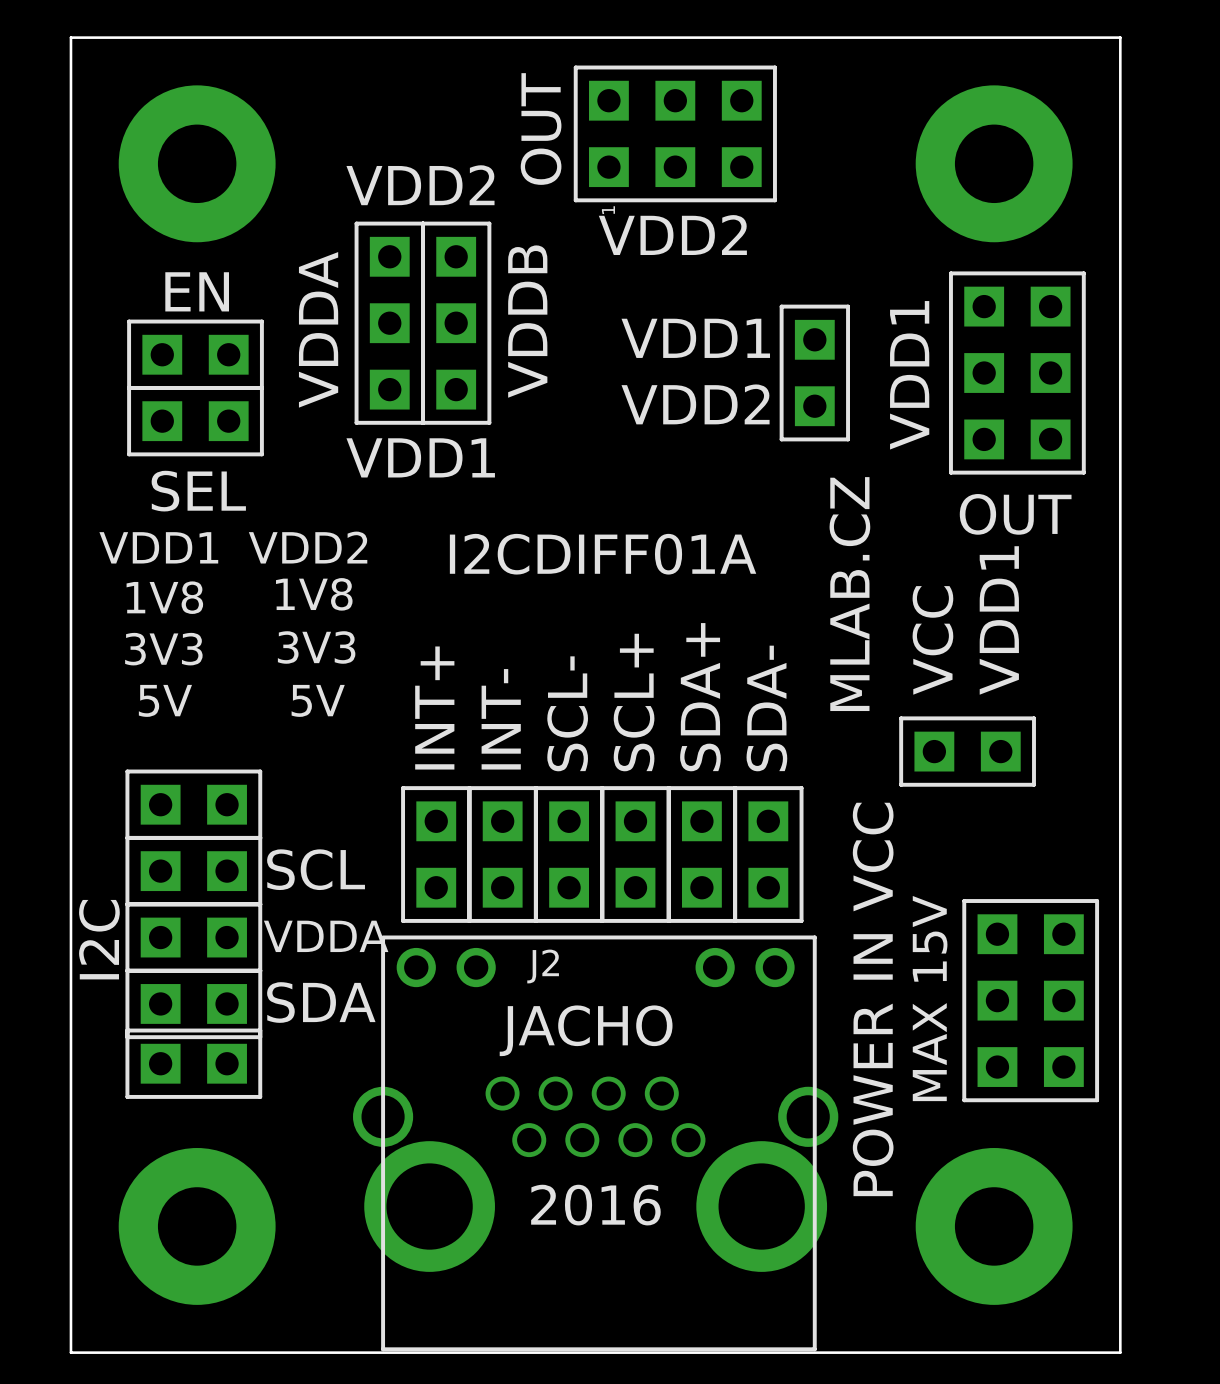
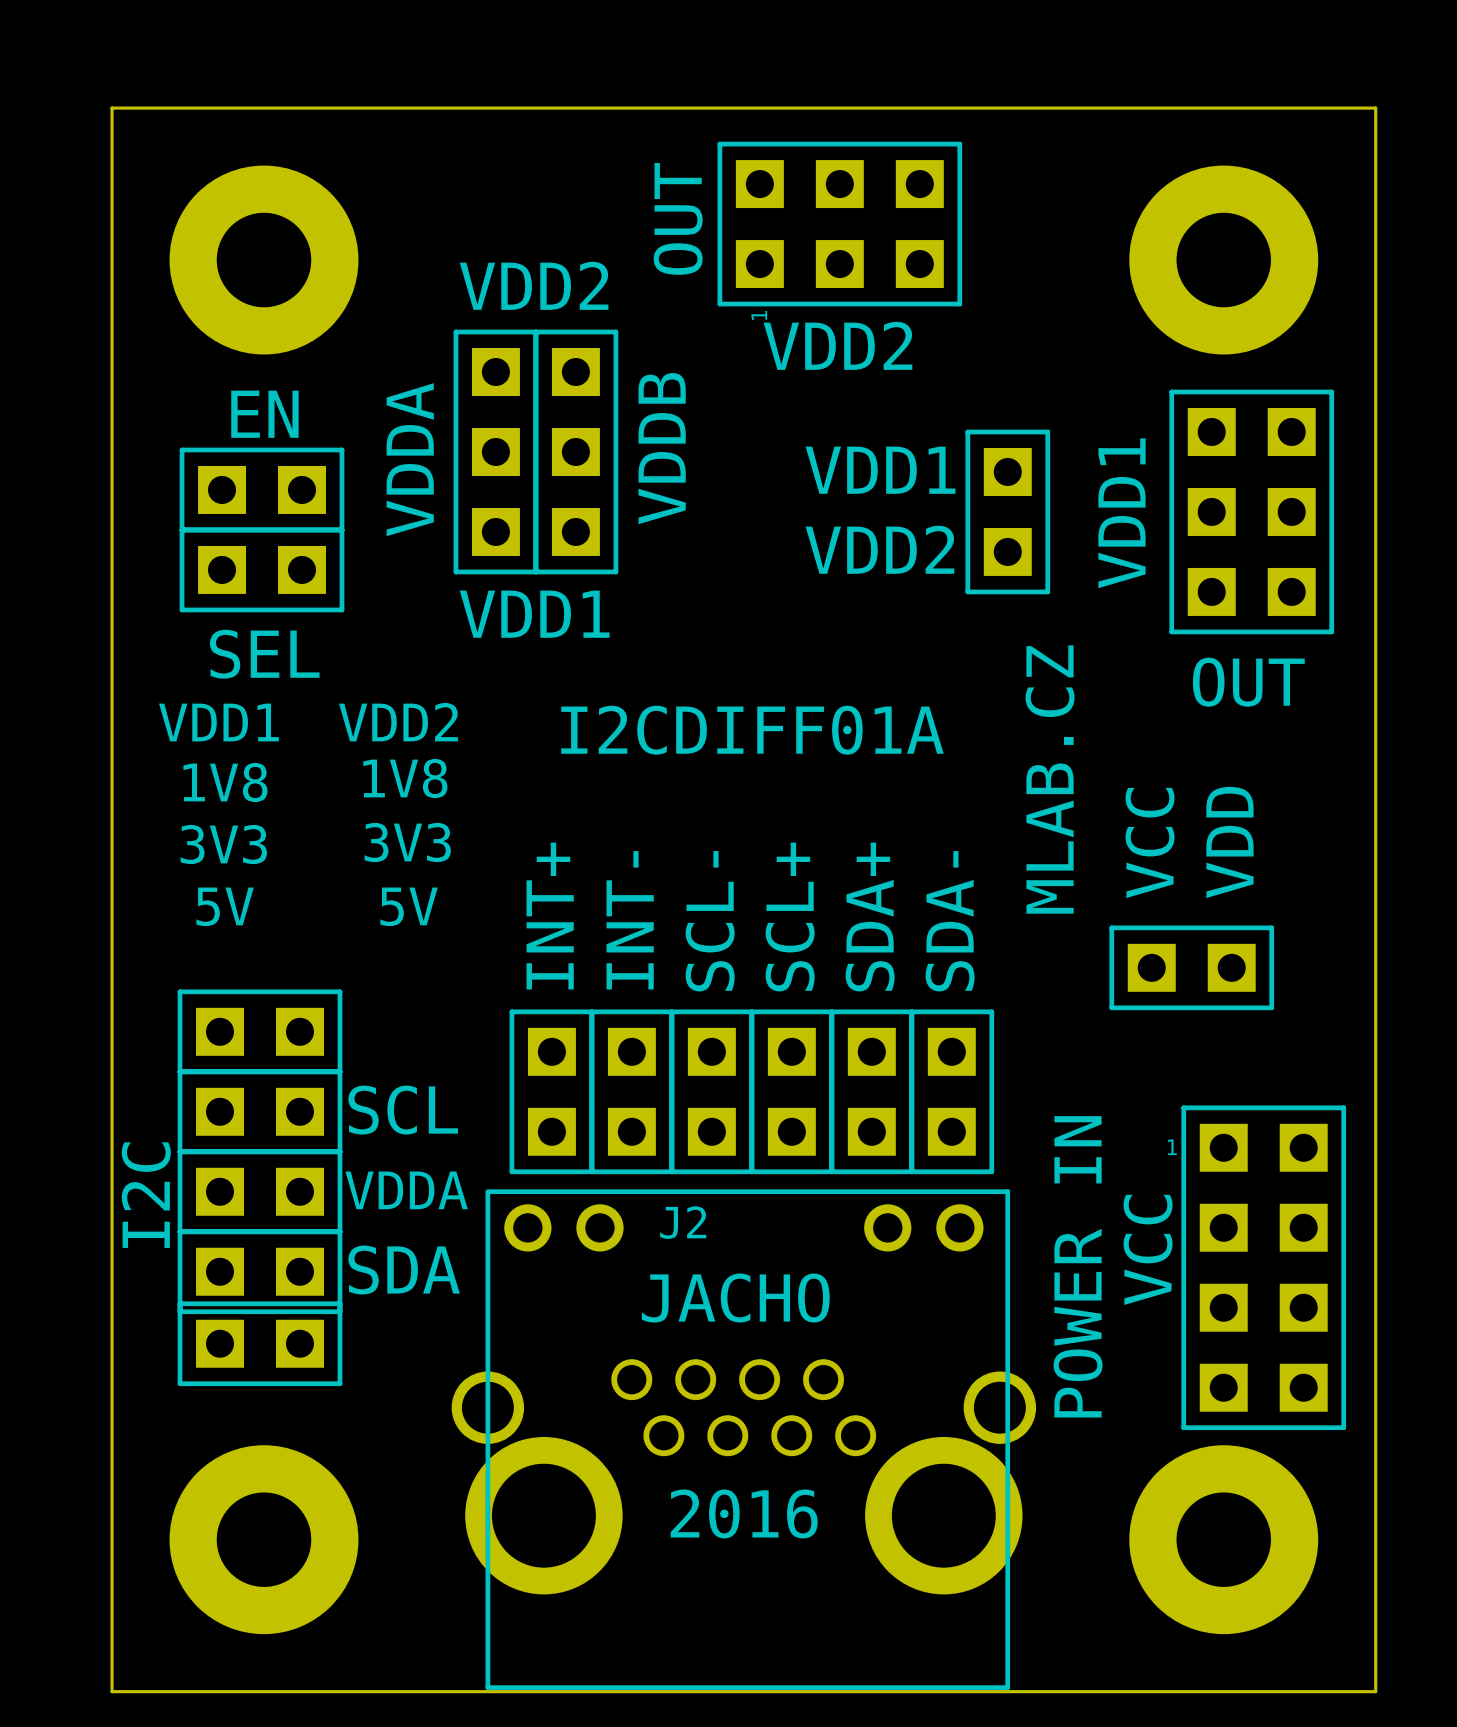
text: VDD1 (999, 620) -> VDD (1229, 842)
part footprint: [962, 899, 1100, 1103] -> [1181, 1105, 1347, 1431]
text: MAX 15V (930, 998) -> VCC (1148, 1249)
text: POWER IN VCC (873, 999) -> POWER IN (1078, 1266)

